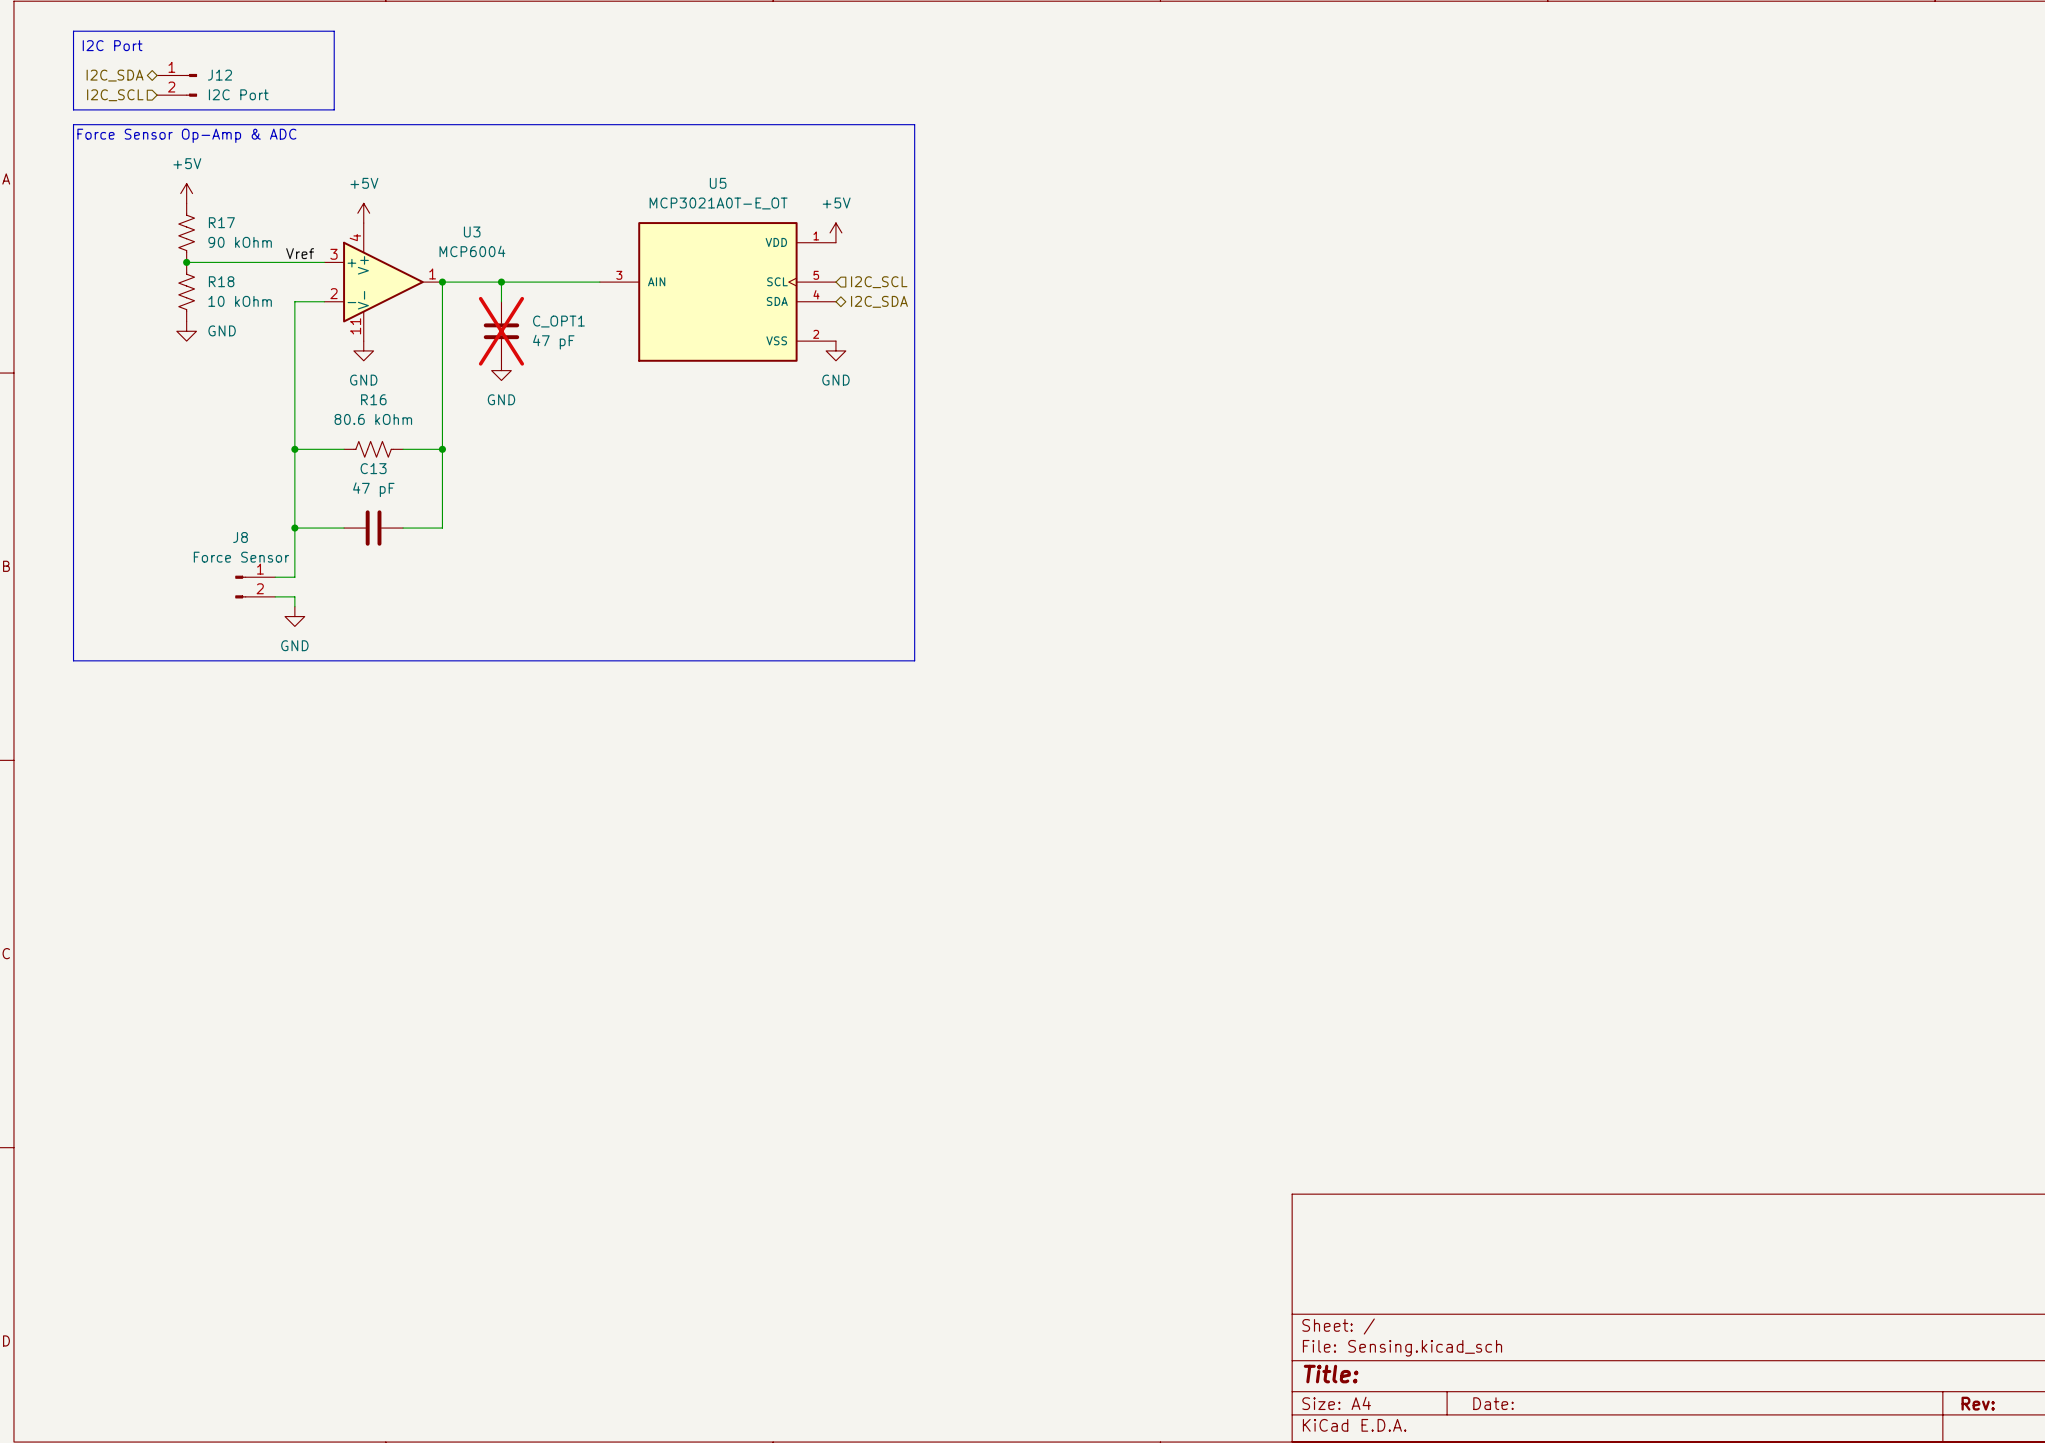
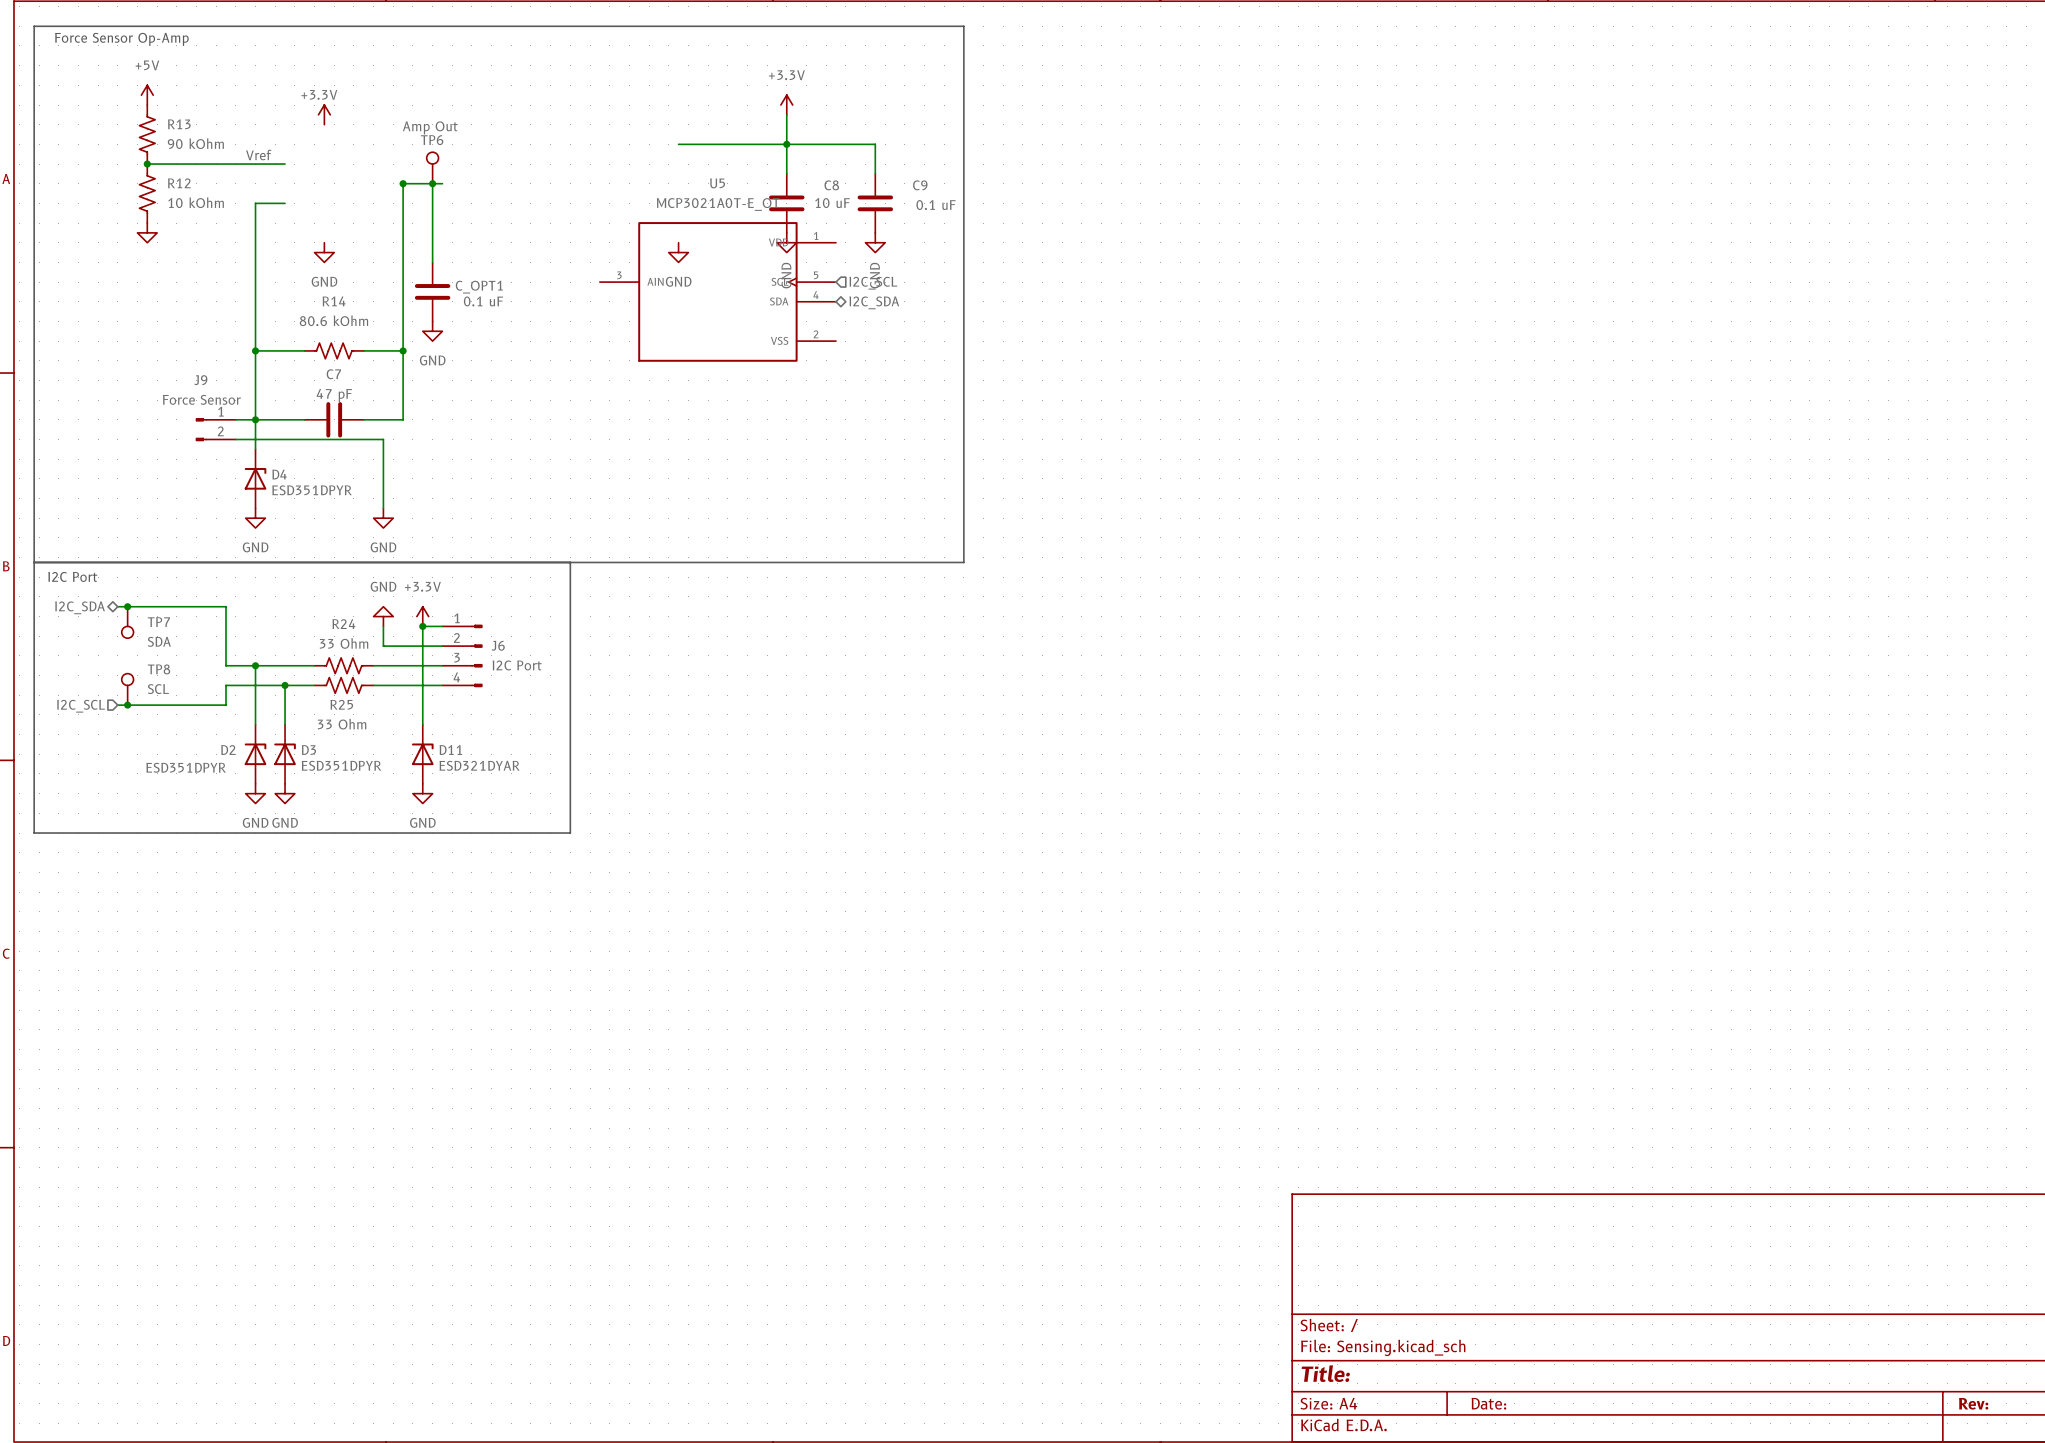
line: (73, 31) (73, 109) (334, 109) (334, 31) (73, 31) -> none
text: none -> Force Sensor Op-Amp (121, 39)
text: I2C Port (112, 45) -> none
hierarchical label: I2C_SDA (115, 75) -> none
J12: I2C Port (177, 85) -> none
hierarchical label: I2C_SCL (115, 95) -> none
power symbol: none -> +3.3V (786, 105)
power symbol: none -> +3.3V (324, 114)
wire: none -> (786, 114) (786, 173)
line: (73, 124) (914, 124) (914, 660) (73, 660) (73, 124) -> none
R13: none -> 90 kOhm (147, 134)
text: Force Sensor Op-Amp & ADC (186, 135) -> none
wire: none -> (678, 144) (875, 144) (875, 173)
junction: none -> (786, 144)
junction: none -> (147, 164)
TP6: none -> Amp Out (432, 167)
junction: none -> (403, 183)
wire: none -> (432, 183) (432, 262)
junction: none -> (432, 183)
wire: none -> (442, 183) (403, 183) (403, 419) (363, 419)
R12: none -> 10 kOhm (147, 193)
power symbol position: +5V (186, 193) -> +5V (147, 95)
wire: none -> (285, 203) (255, 203) (255, 449)
C8: none -> 10 uF (786, 203)
C9: none -> 0.1 uF (875, 203)
power symbol: +5V (363, 213) -> none
power symbol: none -> (147, 232)
R17: 90 kOhm (186, 232) -> none
power symbol: +5V (835, 232) -> none
power symbol: none -> GND (786, 242)
power symbol: none -> GND (875, 242)
power symbol: none -> GND (324, 252)
power symbol: none -> GND (678, 252)
label position: Vref (300, 253) -> Vref (258, 155)
wire: (186, 262) (324, 262) -> (147, 164) (285, 164)
junction: (186, 262) -> none
U3: MCP6004 (383, 282) -> none
junction: (442, 282) -> none
wire: (501, 282) (501, 301) -> none
junction: (501, 282) -> none
wire: (599, 282) (442, 282) (442, 528) (403, 528) -> none
R18: 10 kOhm (186, 291) -> none
wire: (324, 301) (294, 301) (294, 577) (275, 577) -> none
C_OPT1 name position: C_OPT1 (558, 321) -> C_OPT1 (479, 287)
power symbol: GND (186, 331) -> none
power symbol: none -> GND (432, 331)
C_OPT1 position: (501, 331) -> (432, 291)
C_OPT1 do-not-place cross: (501, 331) -> none
C_OPT1 value: 47 pF (553, 342) -> 0.1 uF (483, 301)
junction: none -> (255, 350)
R14: none -> 80.6 kOhm (334, 350)
power symbol: GND (363, 350) -> none
junction: none -> (403, 350)
power symbol: GND (835, 350) -> none
power symbol: GND (501, 370) -> none
wire: none -> (235, 419) (304, 419)
junction: none -> (255, 419)
C7: none -> 47 pF (334, 419)
J9: none -> Force Sensor (215, 429)
wire: none -> (235, 439) (383, 439) (383, 508)
wire: (294, 449) (344, 449) -> (255, 350) (304, 350)
junction: (294, 449) -> none
R16: 80.6 kOhm (373, 449) -> none
wire: (403, 449) (442, 449) -> (363, 350) (403, 350)
junction: (442, 449) -> none
D4: none -> ESD351DPYR (255, 478)
power symbol: none -> GND (255, 518)
power symbol: none -> GND (383, 518)
wire: (294, 528) (344, 528) -> none
junction: (294, 528) -> none
C13: 47 pF (373, 528) -> none
line: none -> (34, 562) (963, 562) (963, 26) (34, 26) (34, 833) (570, 833) (570, 562)
text: none -> I2C Port (72, 576)
J8: Force Sensor (255, 587) -> none
wire: (275, 596) (294, 596) (294, 606) -> none
hierarchical label: none -> I2C_SDA (80, 607)
wire: none -> (117, 606) (226, 606) (226, 665) (314, 665)
junction: none -> (127, 606)
power symbol: GND (294, 616) -> none
power symbol: none -> GND (383, 616)
power symbol: none -> +3.3V (422, 616)
TP7: none -> SDA (127, 622)
wire: none -> (383, 626) (383, 646) (442, 646)
junction: none -> (422, 626)
wire: none -> (442, 626) (422, 626) (422, 724)
J6: none -> I2C Port (462, 655)
wire: none -> (255, 665) (255, 724)
junction: none -> (255, 665)
R24: none -> 33 Ohm (344, 665)
wire: none -> (373, 665) (442, 665)
wire: none -> (285, 685) (285, 724)
junction: none -> (285, 685)
wire: none -> (314, 685) (226, 685) (226, 705) (117, 705)
R25: none -> 33 Ohm (344, 685)
wire: none -> (373, 685) (442, 685)
TP8: none -> SCL (127, 689)
hierarchical label: none -> I2C_SCL (81, 706)
junction: none -> (127, 705)
D2: none -> ESD351DPYR (255, 754)
D3: none -> ESD351DPYR (285, 754)
D11: none -> ESD321DYAR (422, 754)
power symbol: none -> GND (255, 793)
power symbol: none -> GND (285, 793)
power symbol: none -> GND (422, 793)

